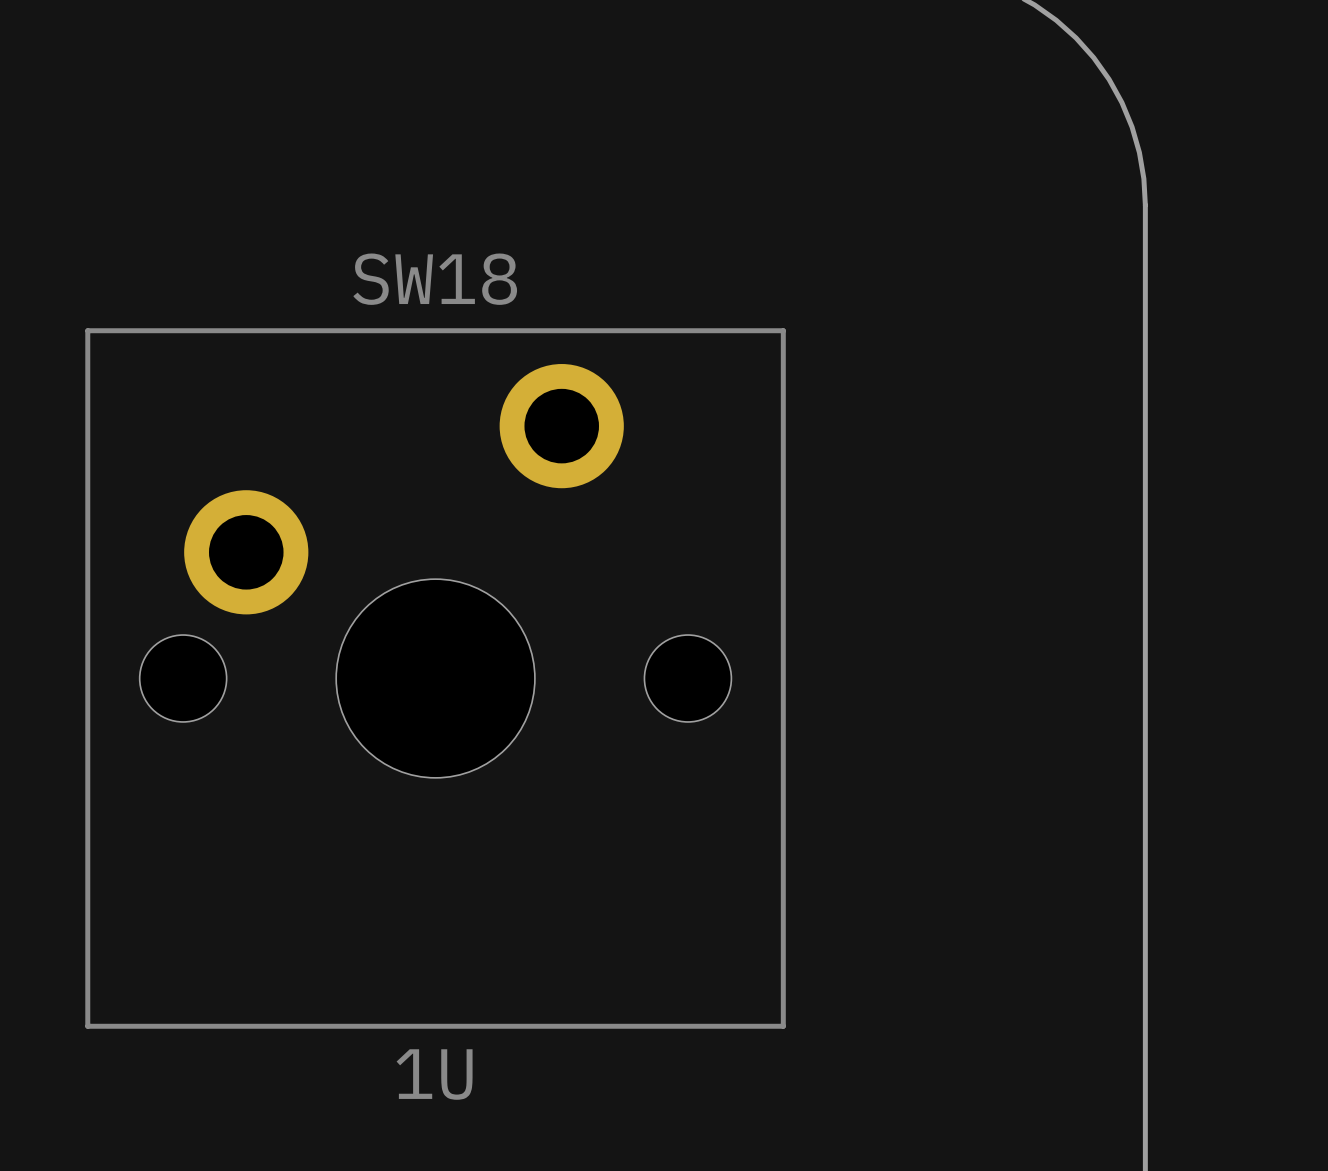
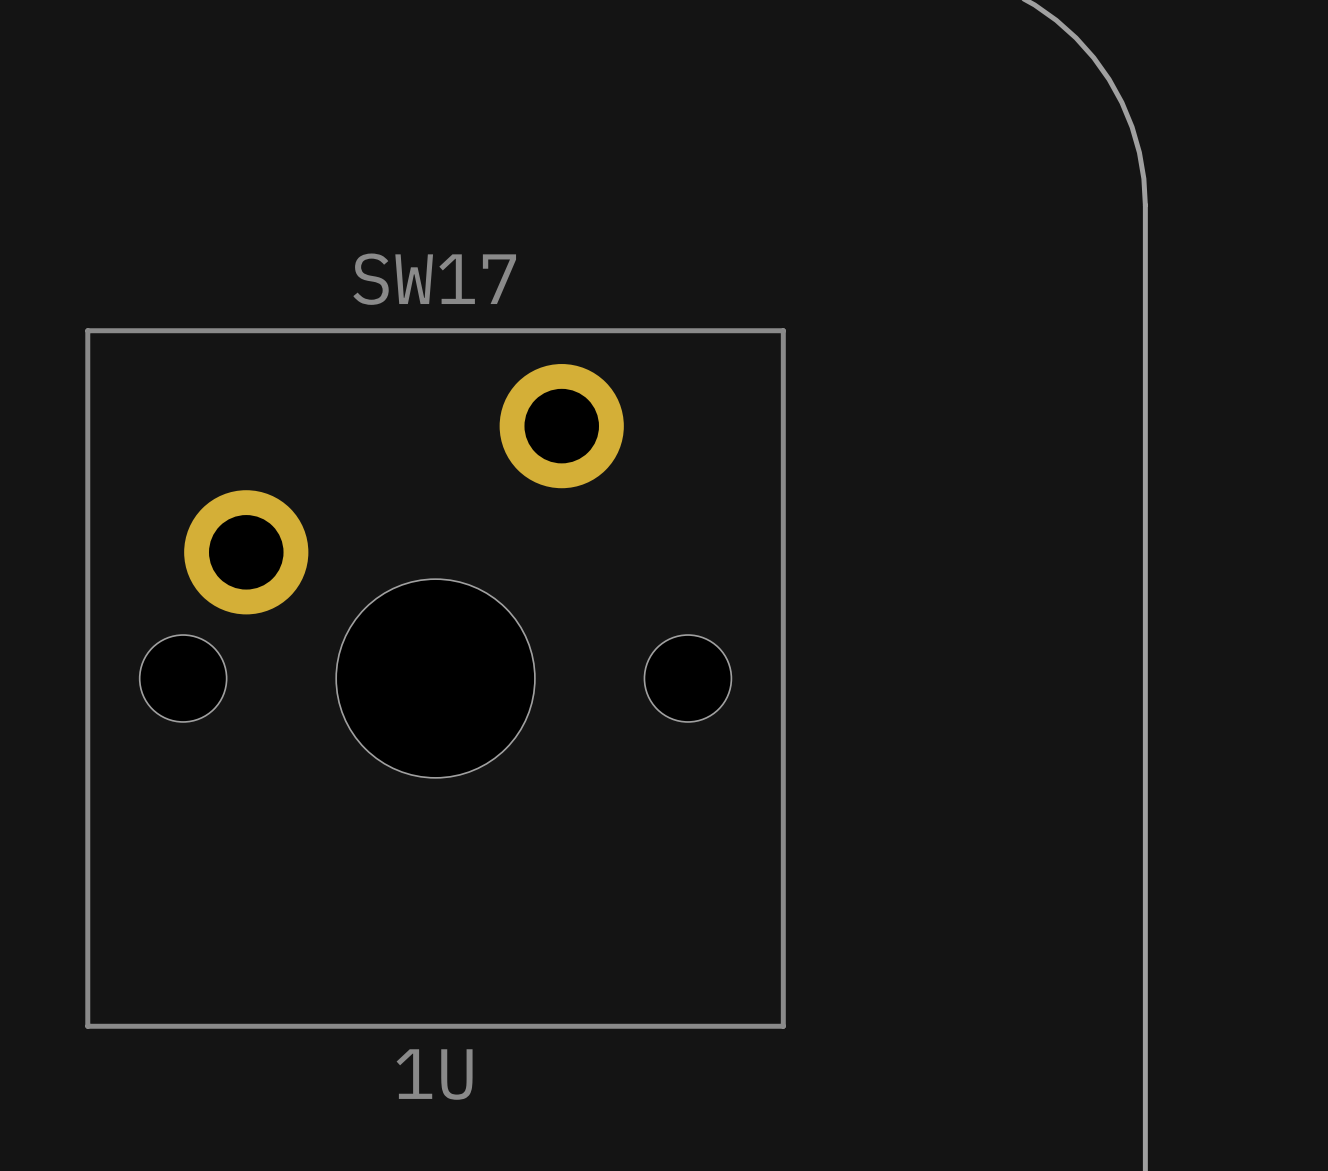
SW18 name: SW18 (435, 279) -> SW17 (434, 279)

